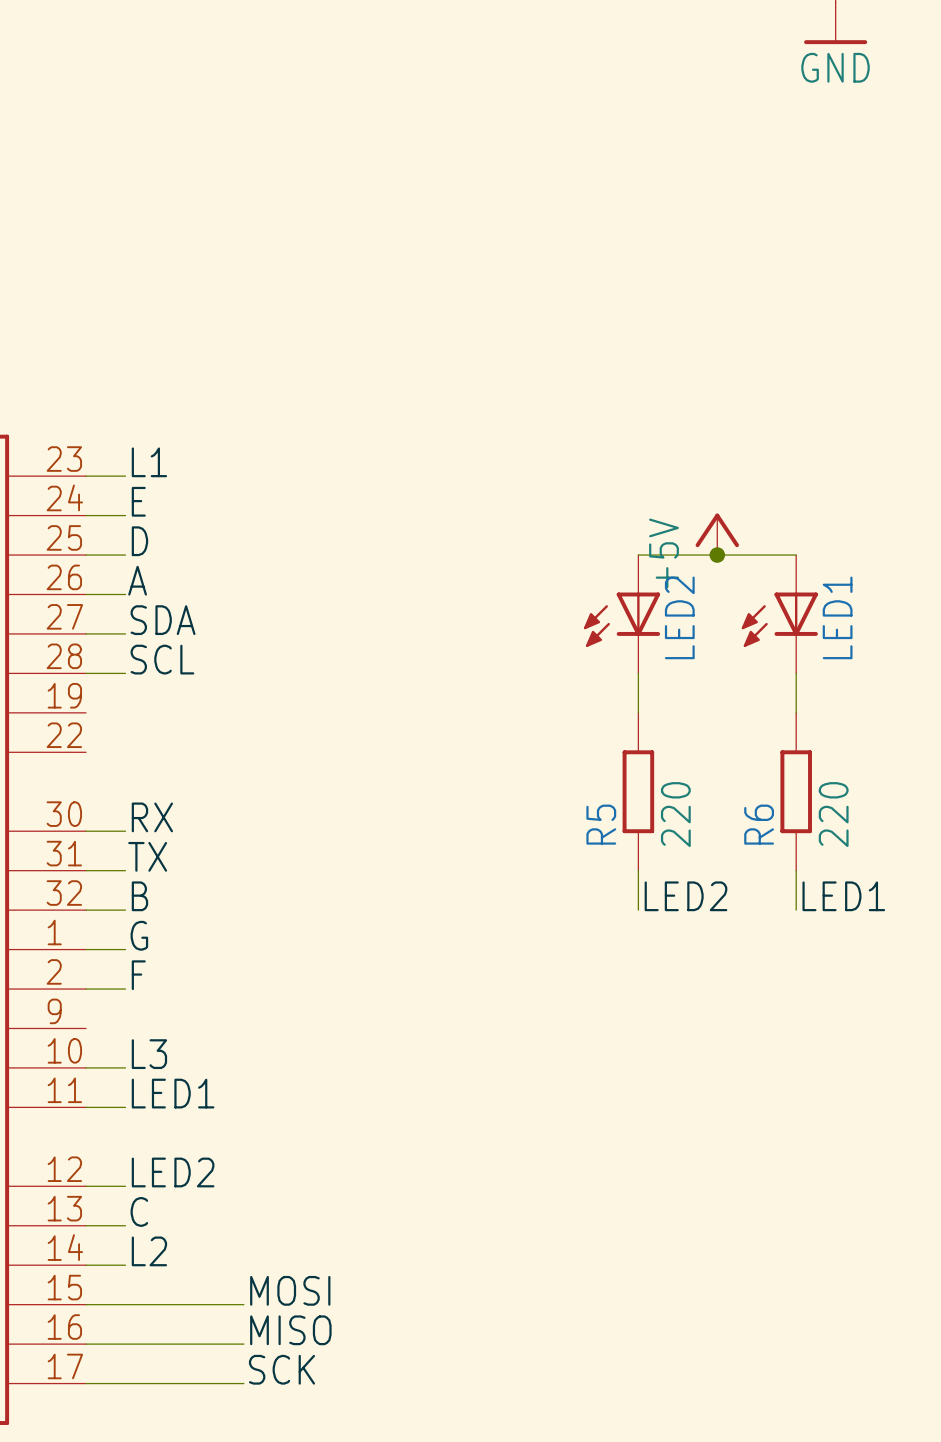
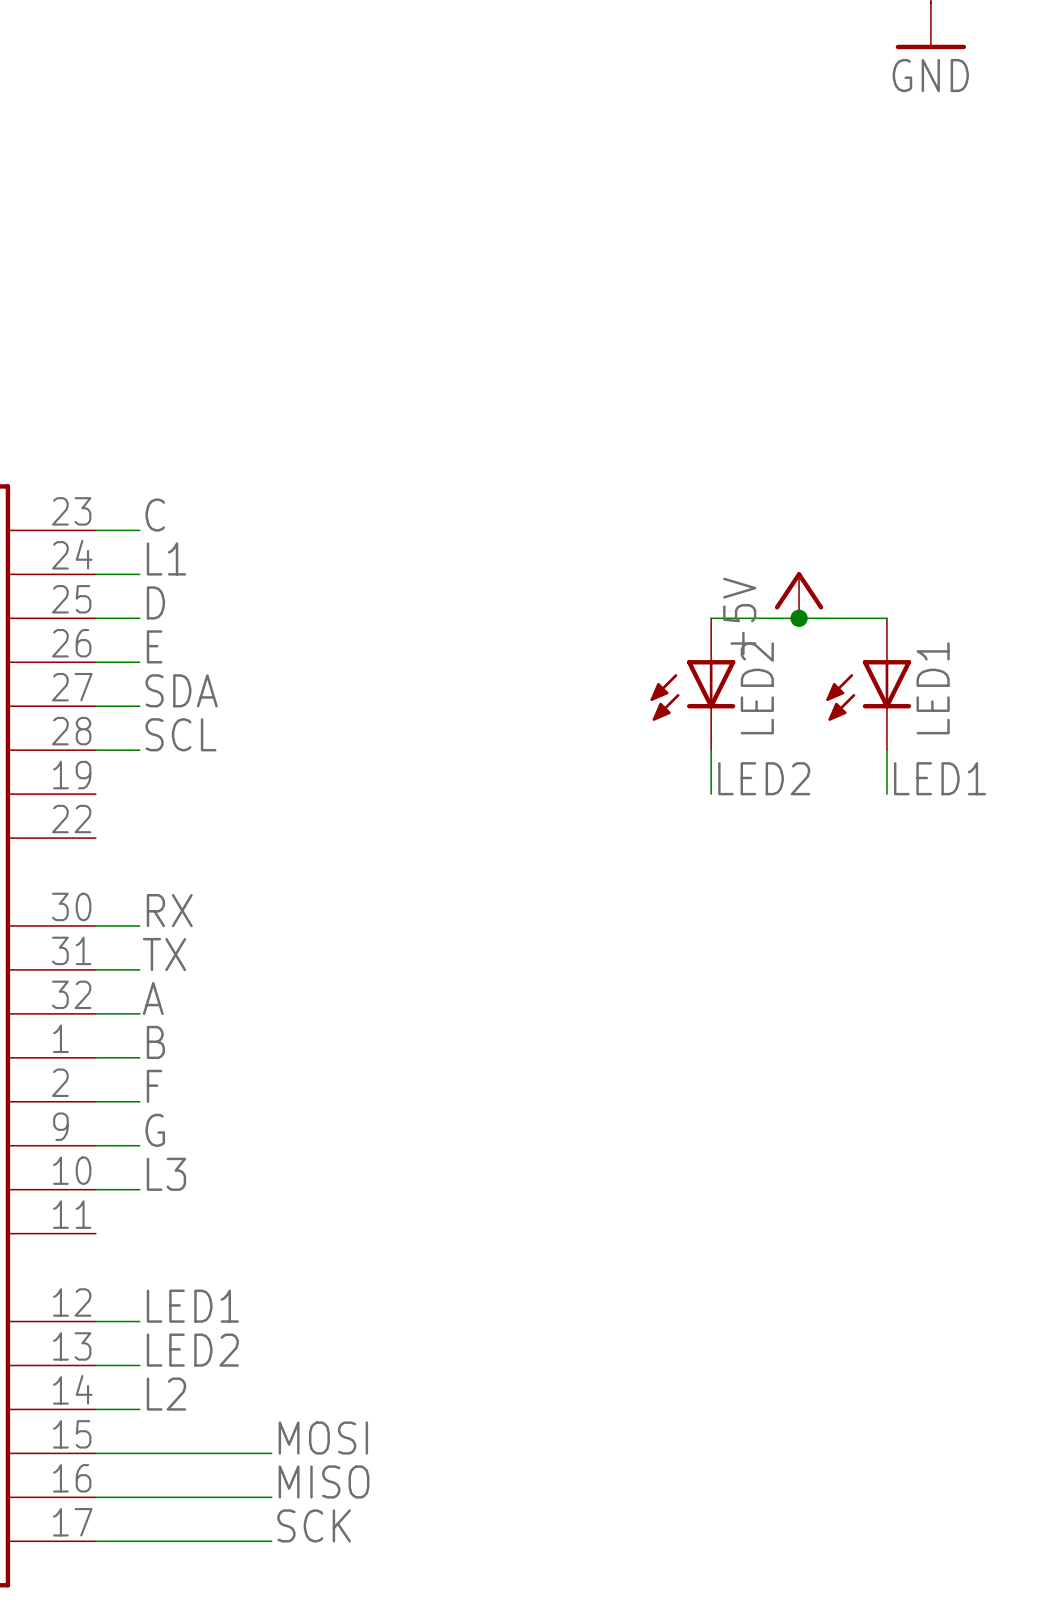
label: L1 (149, 462) -> C (155, 515)
label: E (138, 501) -> L1 (166, 558)
label: A (137, 580) -> E (154, 646)
R5: 220 (638, 791) -> none
R6: 220 (796, 791) -> none
wire: (638, 870) (638, 910) -> none
wire: (796, 870) (796, 910) -> none
label: B (139, 896) -> A (153, 998)
label position: LED2 (685, 896) -> LED2 (764, 778)
label position: LED1 (843, 896) -> LED1 (940, 778)
label: G (139, 935) -> B (155, 1042)
label: none -> G (155, 1130)
label: LED1 (173, 1093) -> none
wire: (86, 1107) (125, 1107) -> (95, 1145) (139, 1145)
label: LED2 (173, 1172) -> LED1 (192, 1306)
label: C (139, 1211) -> LED2 (192, 1350)

